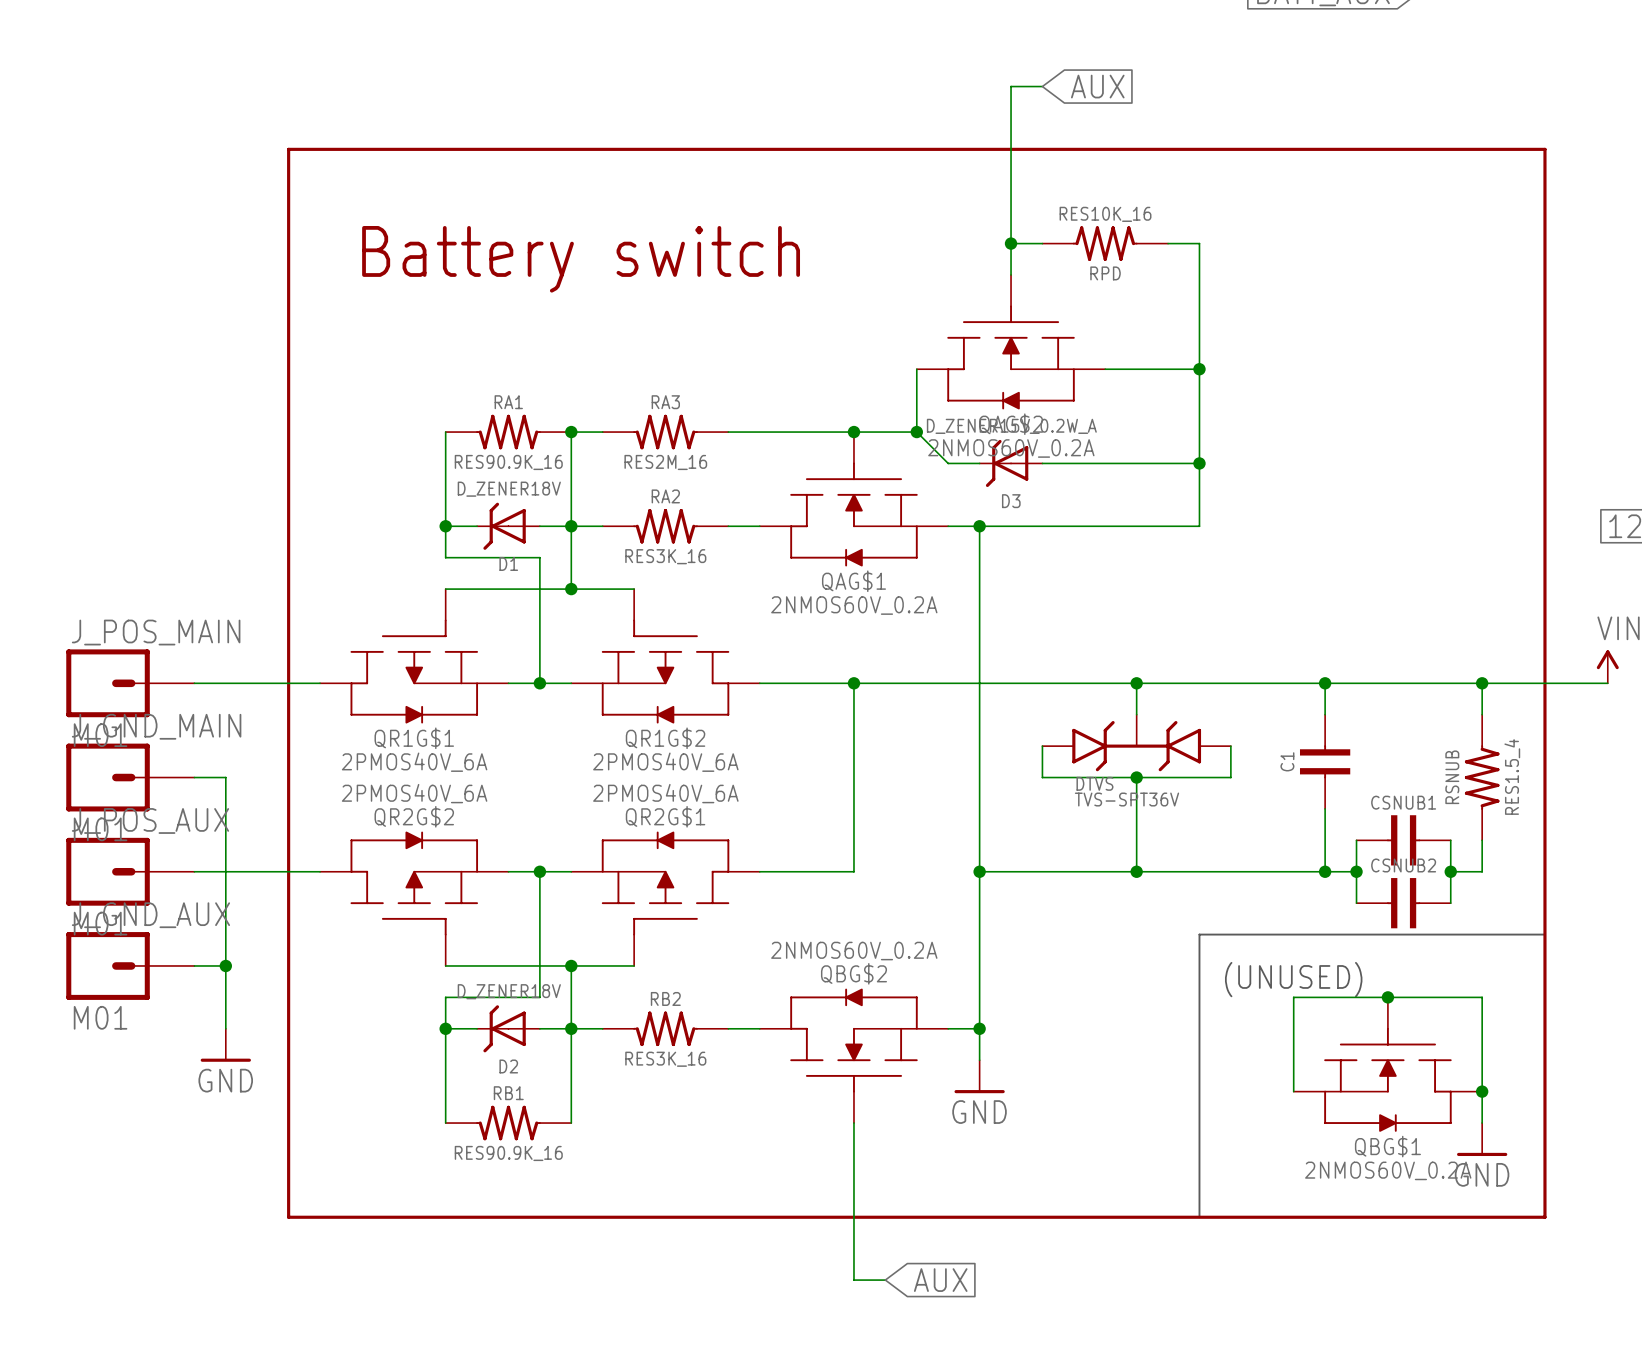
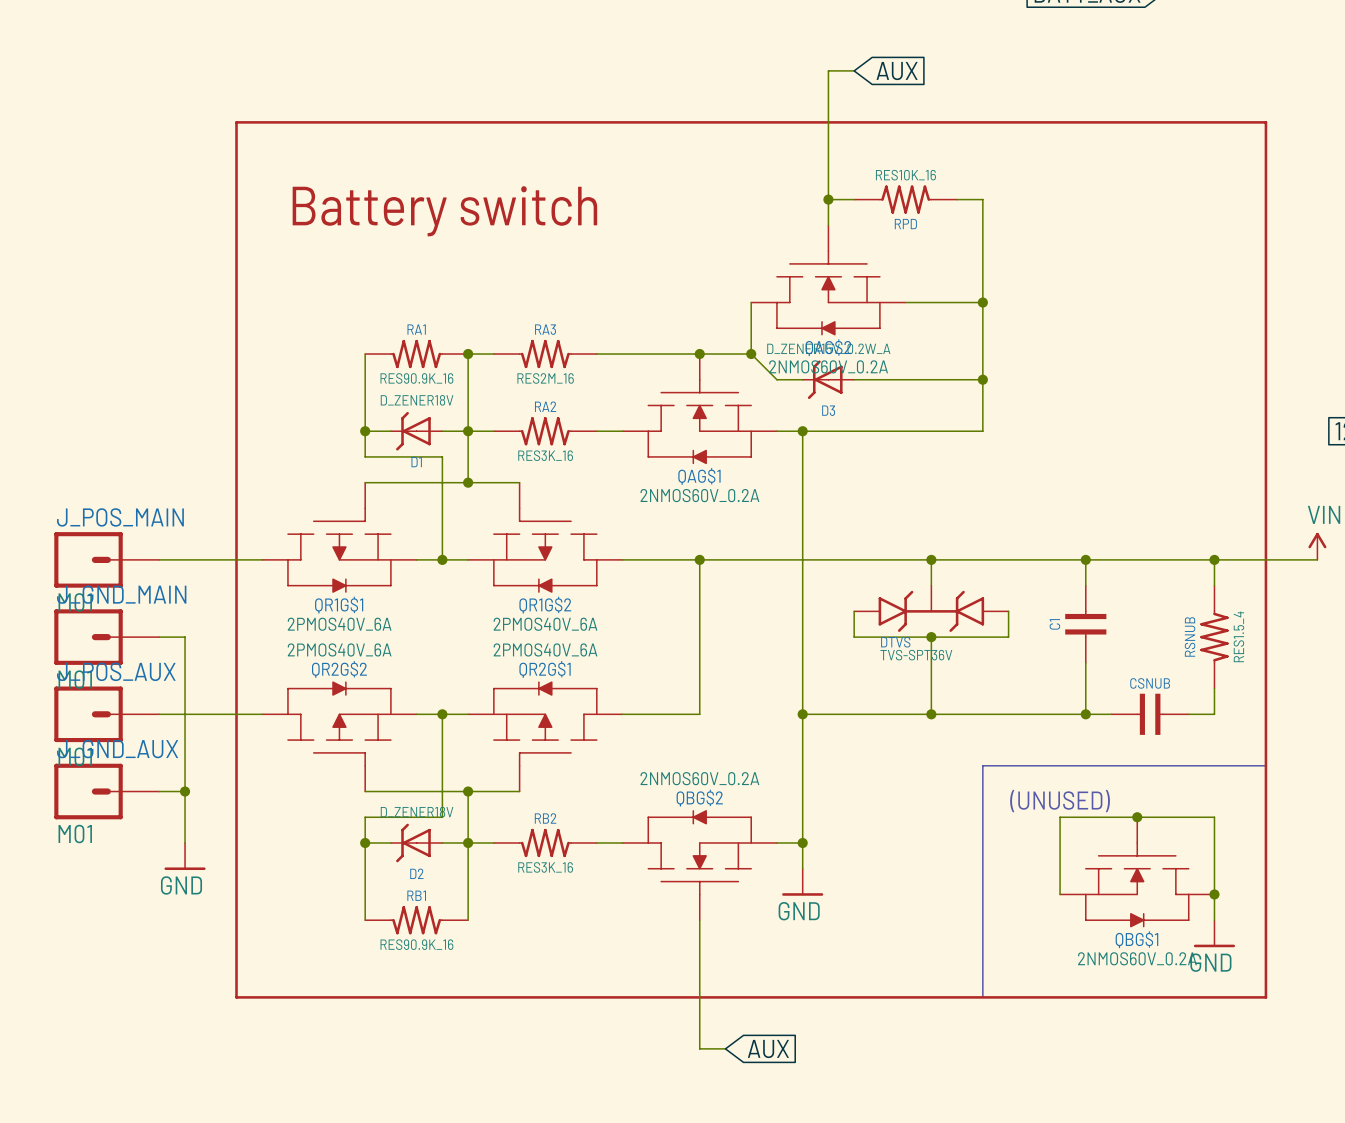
wire: (1356, 840) (1356, 903) -> none
CSNUB1: (1403, 840) -> none
wire: (1450, 840) (1450, 903) -> none
junction: (1356, 871) -> none
CSNUB: none -> (1150, 714)
junction: (1450, 871) -> none
CSNUB2: (1403, 903) -> none

